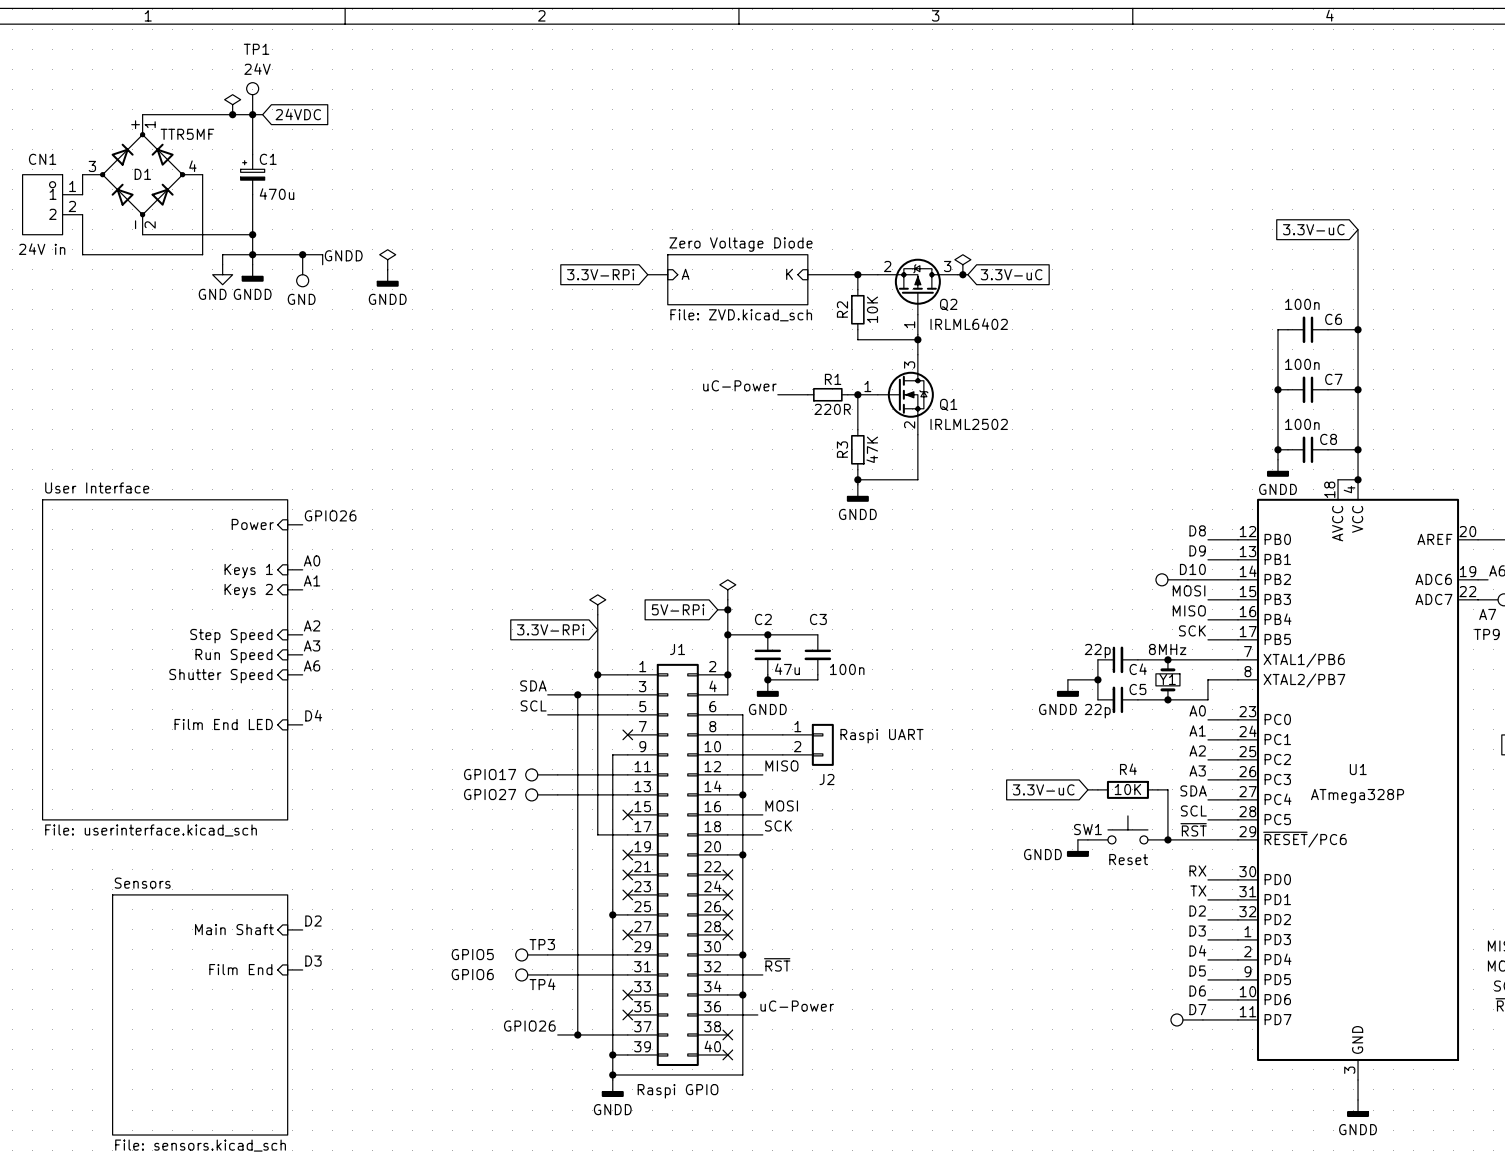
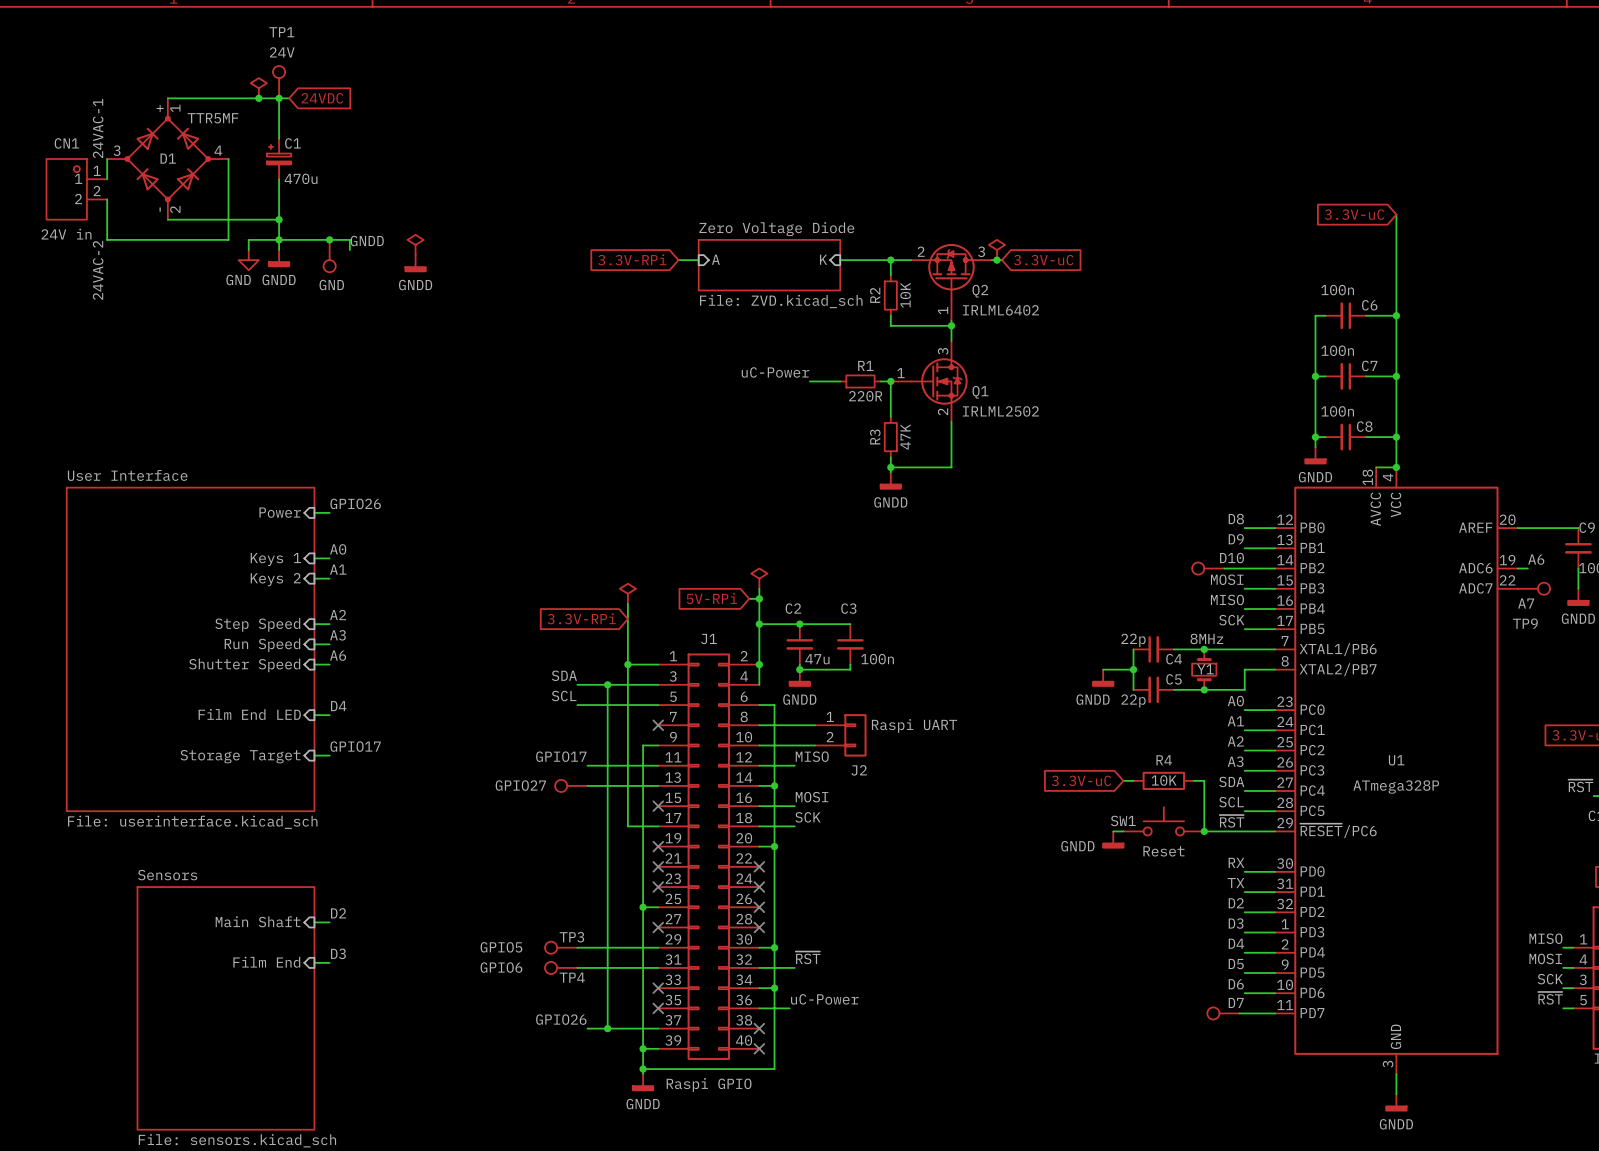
label: none -> 24VAC-1 (98, 128)
label: none -> 24VAC-2 (98, 270)
label: none -> GPIO17 (355, 746)
wire: none -> (314, 755) (329, 755)
label: none -> GPIO17 (561, 756)
sheet pin: none -> Storage Target (240, 756)
part: GPIO17 (541, 774) -> none

